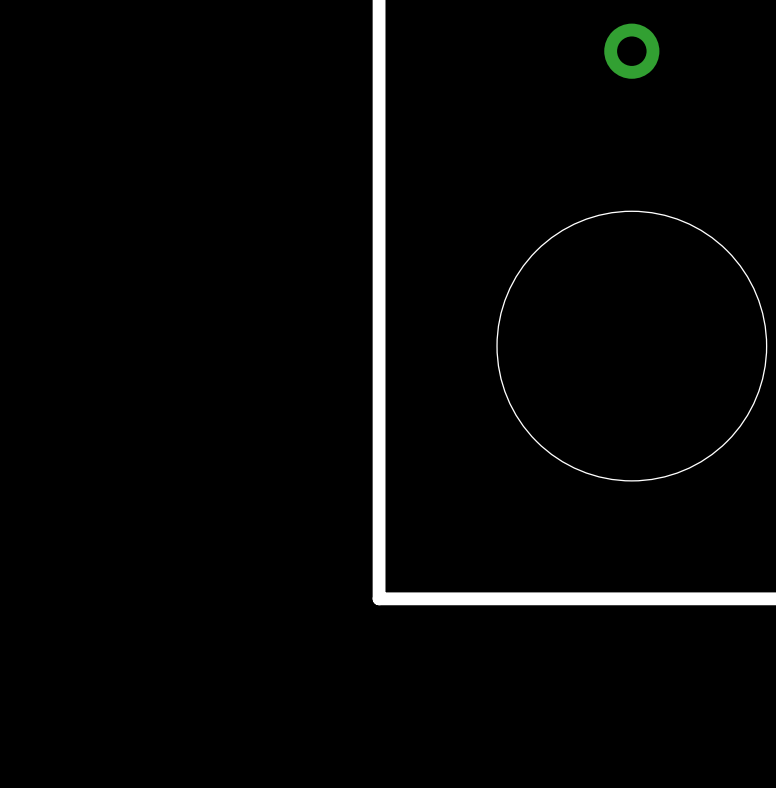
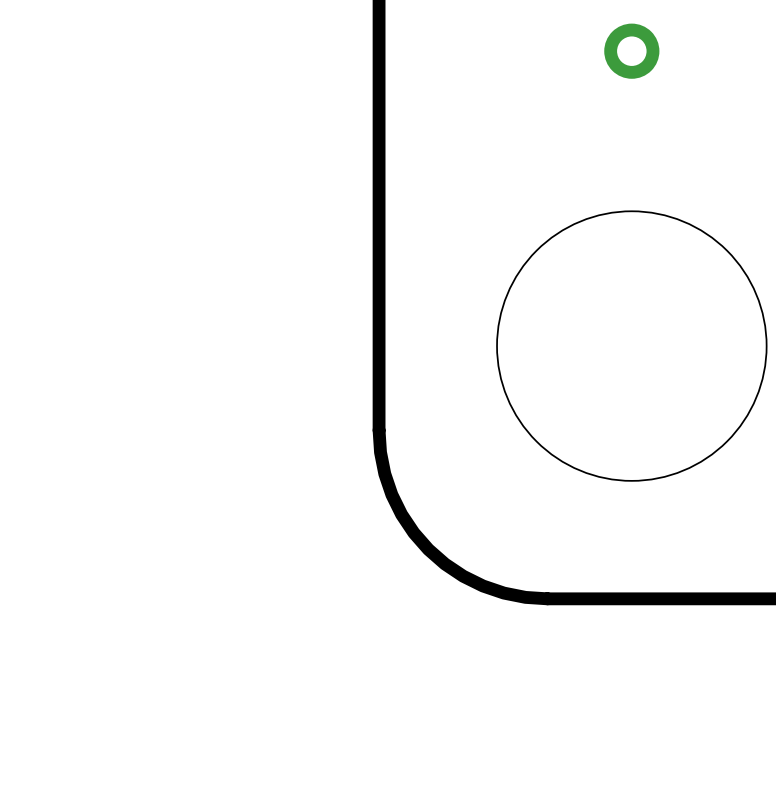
board edge: (379, 430) (379, 598) (547, 598) -> (379, 430) (384, 473) (391, 494) (401, 514) (428, 549) (463, 576) (483, 586) (503, 593) (547, 598)

